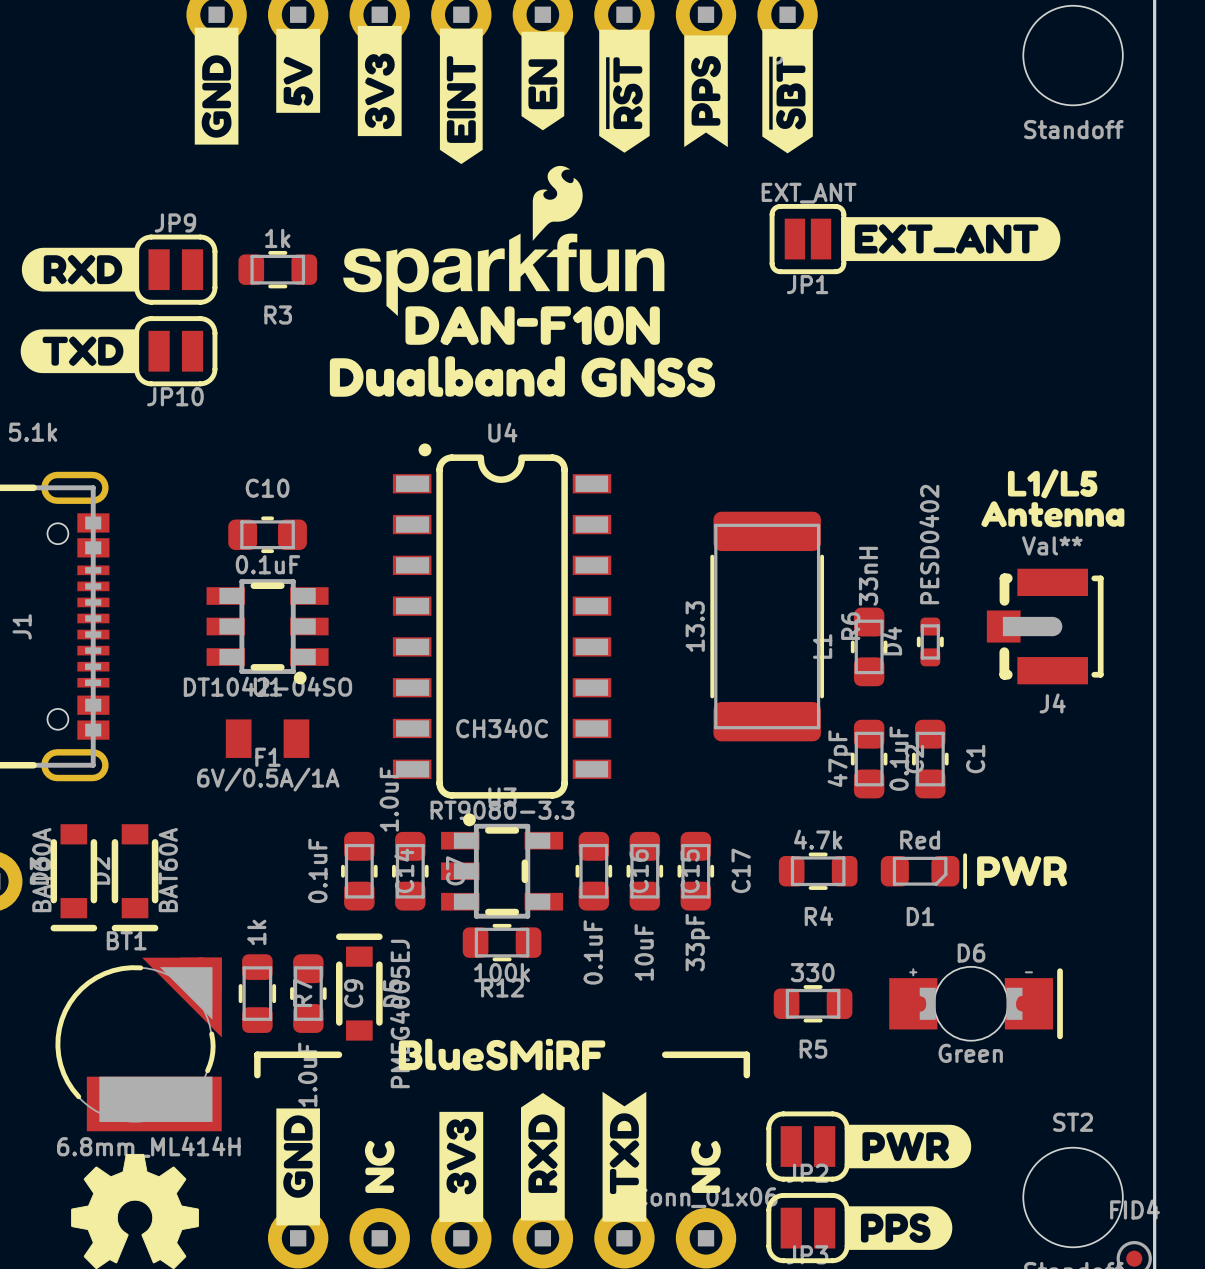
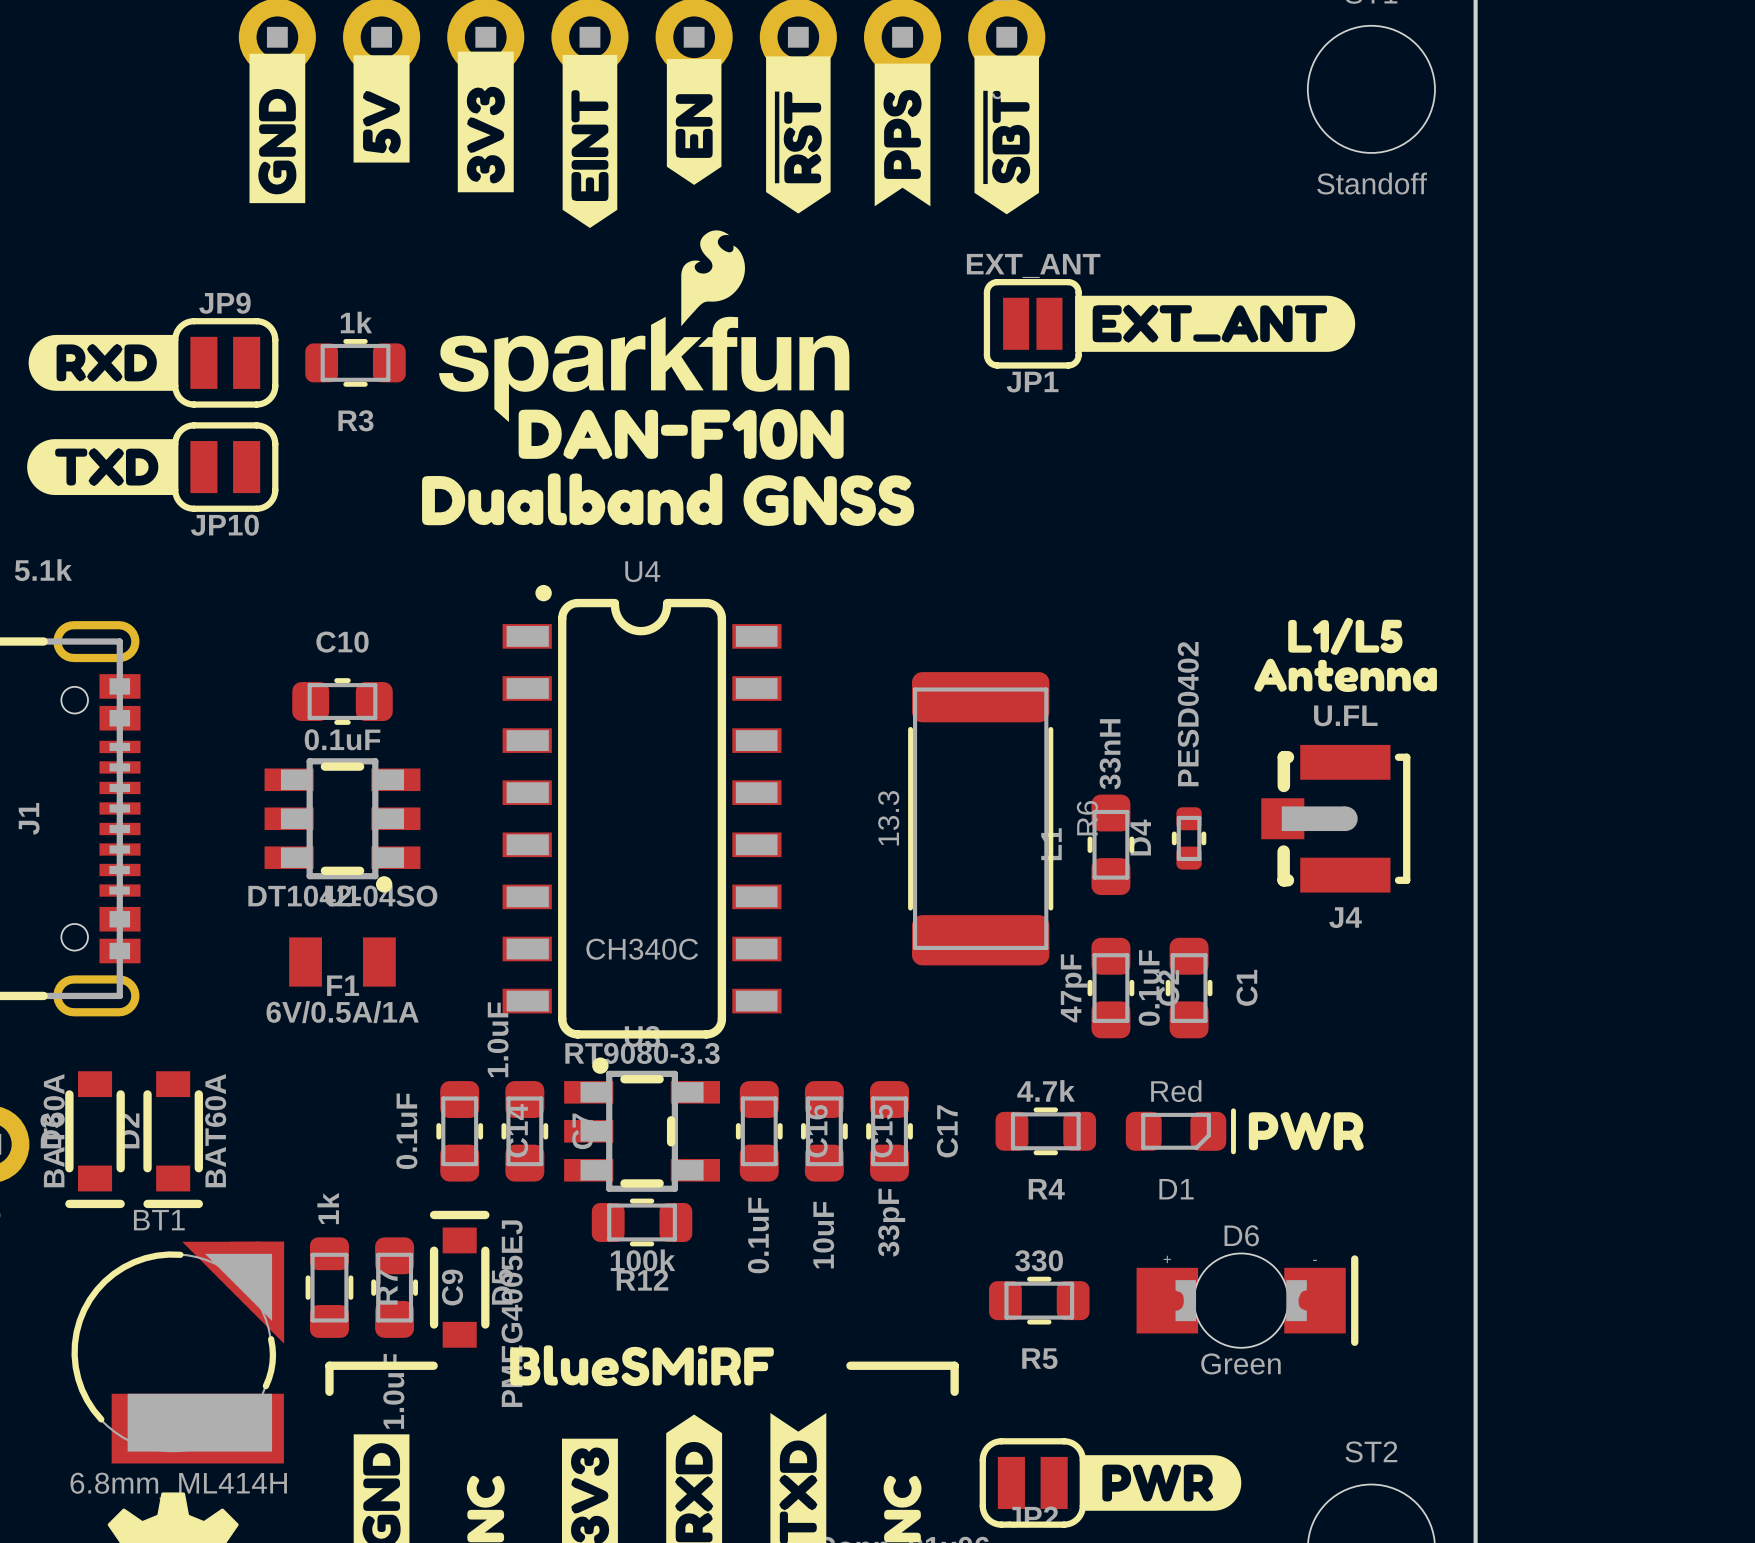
J4 value: Val** (1052, 545) -> U.FL (1345, 715)

